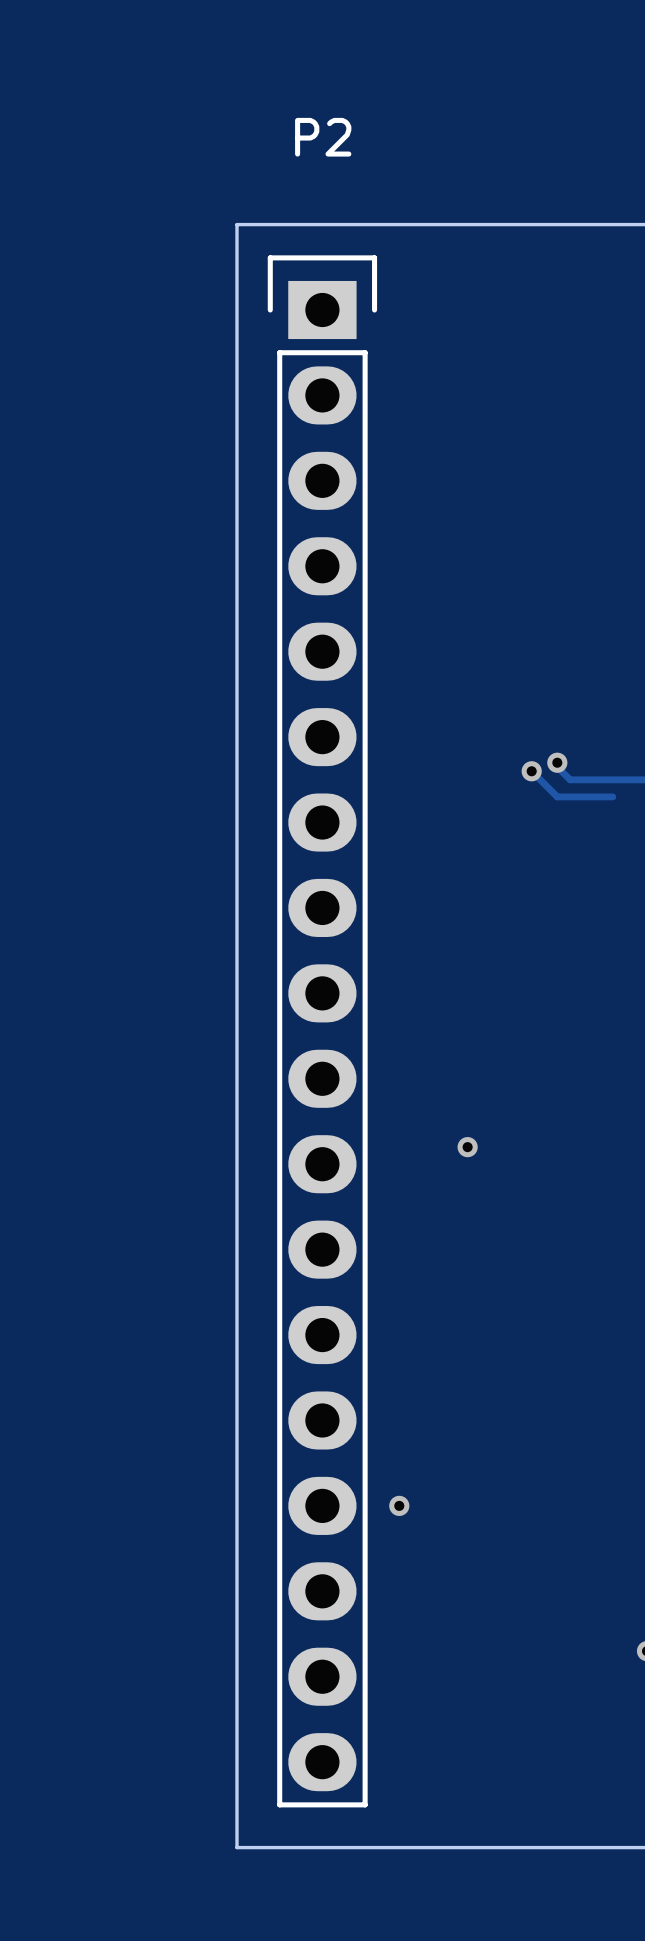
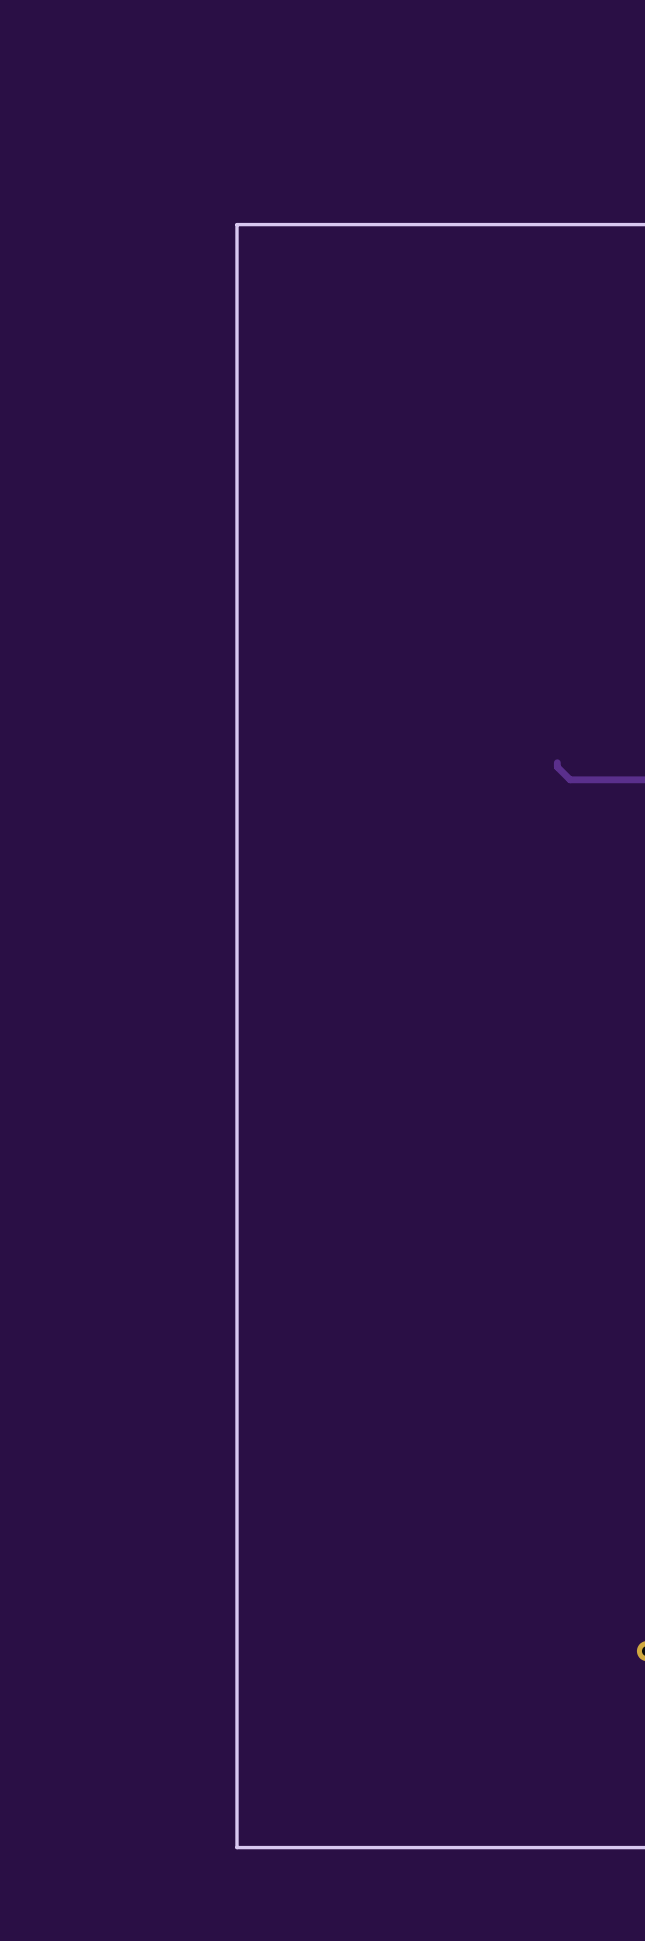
via: (557, 762) -> none
track: (531, 771) (557, 796) (612, 796) -> none
via: (531, 771) -> none
P2: (322, 1031) -> none
via: (467, 1147) -> none
via: (399, 1505) -> none

